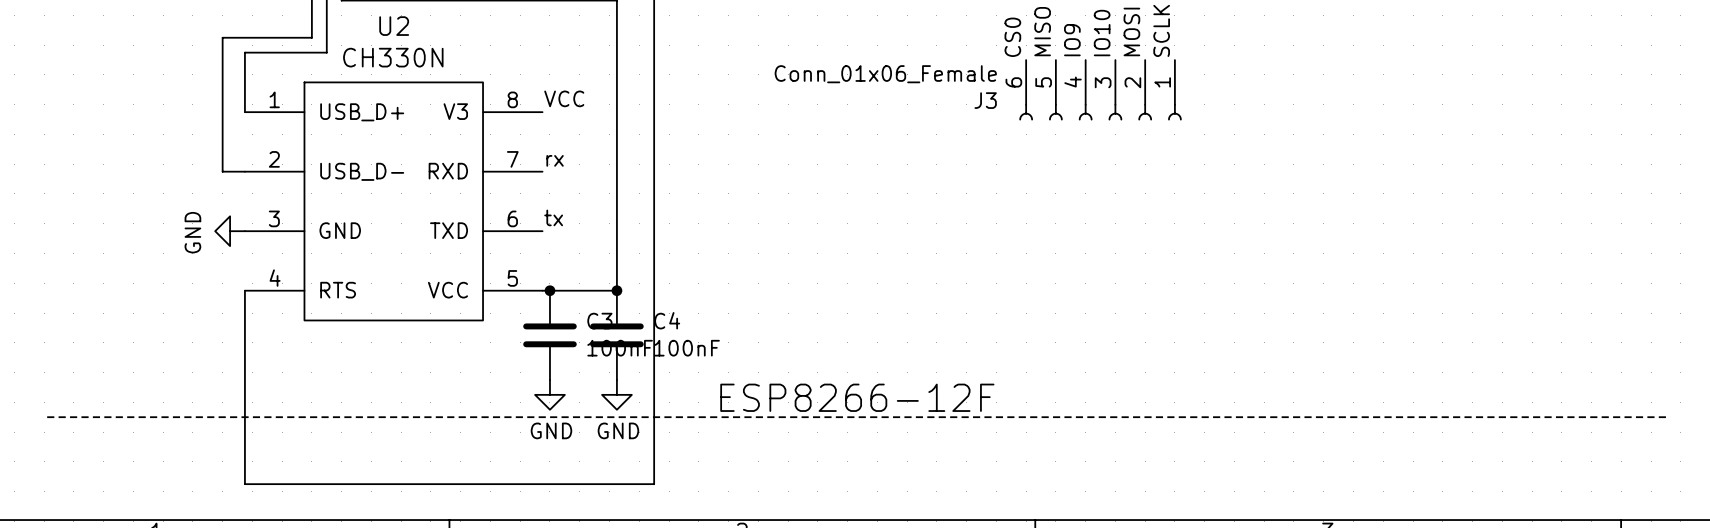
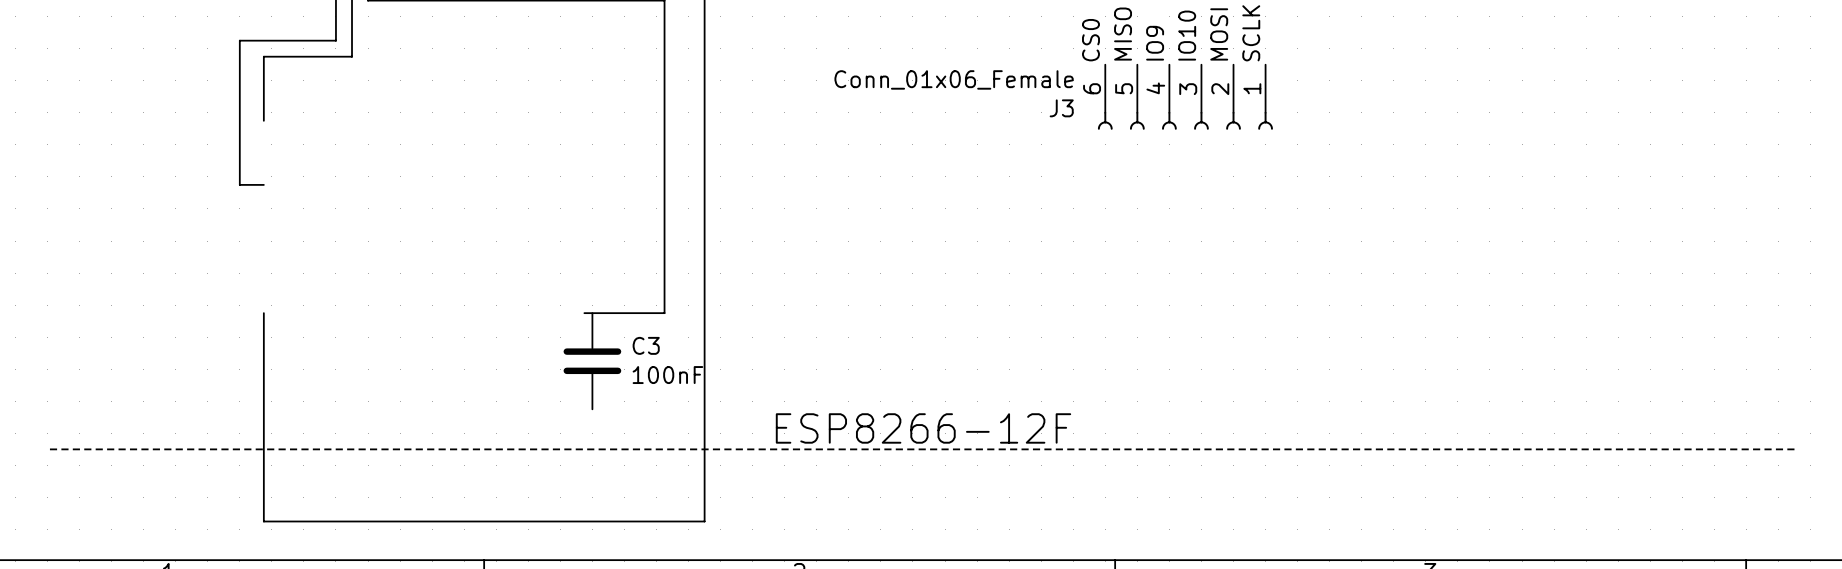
label: VCC (564, 98) -> none
label: rx (555, 160) -> none
U2: CH330N (393, 201) -> none
label: tx (553, 217) -> none
power symbol: GND (230, 231) -> none
junction: (549, 290) -> none
junction: (616, 290) -> none
C4: 100nF (616, 335) -> none
power symbol: GND (549, 394) -> none
power symbol: GND (616, 394) -> none

